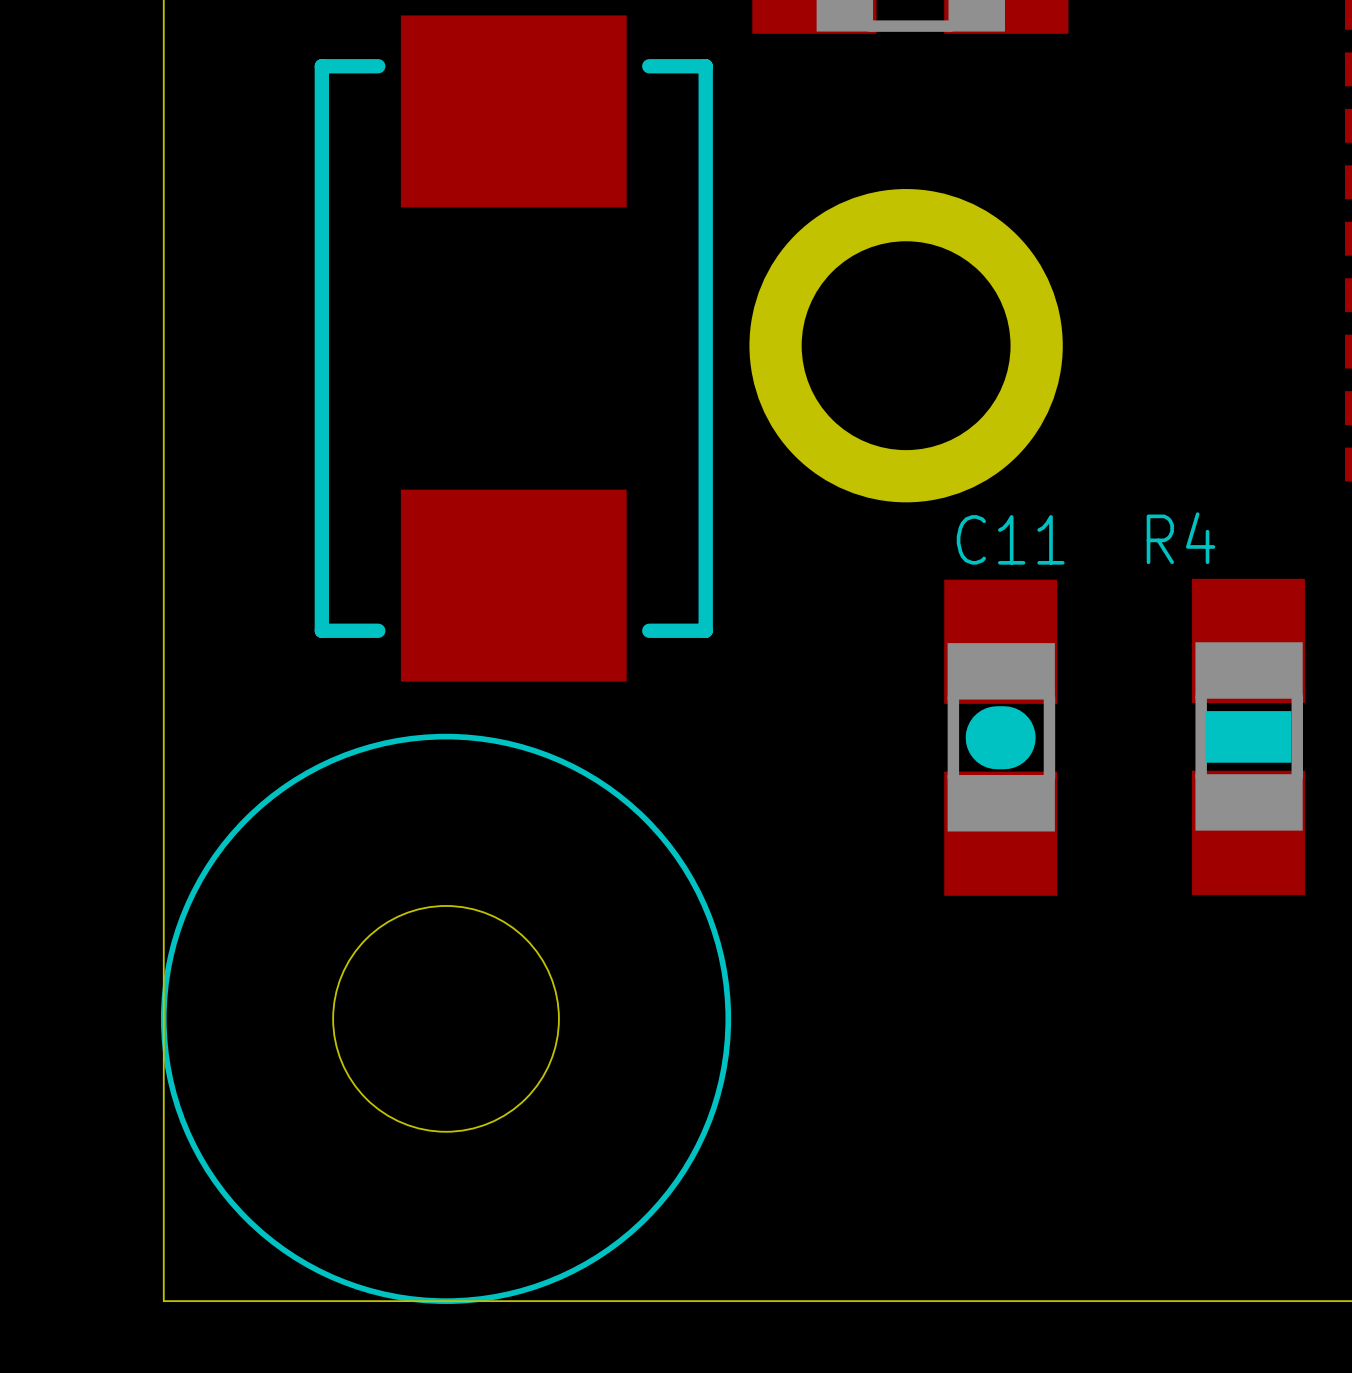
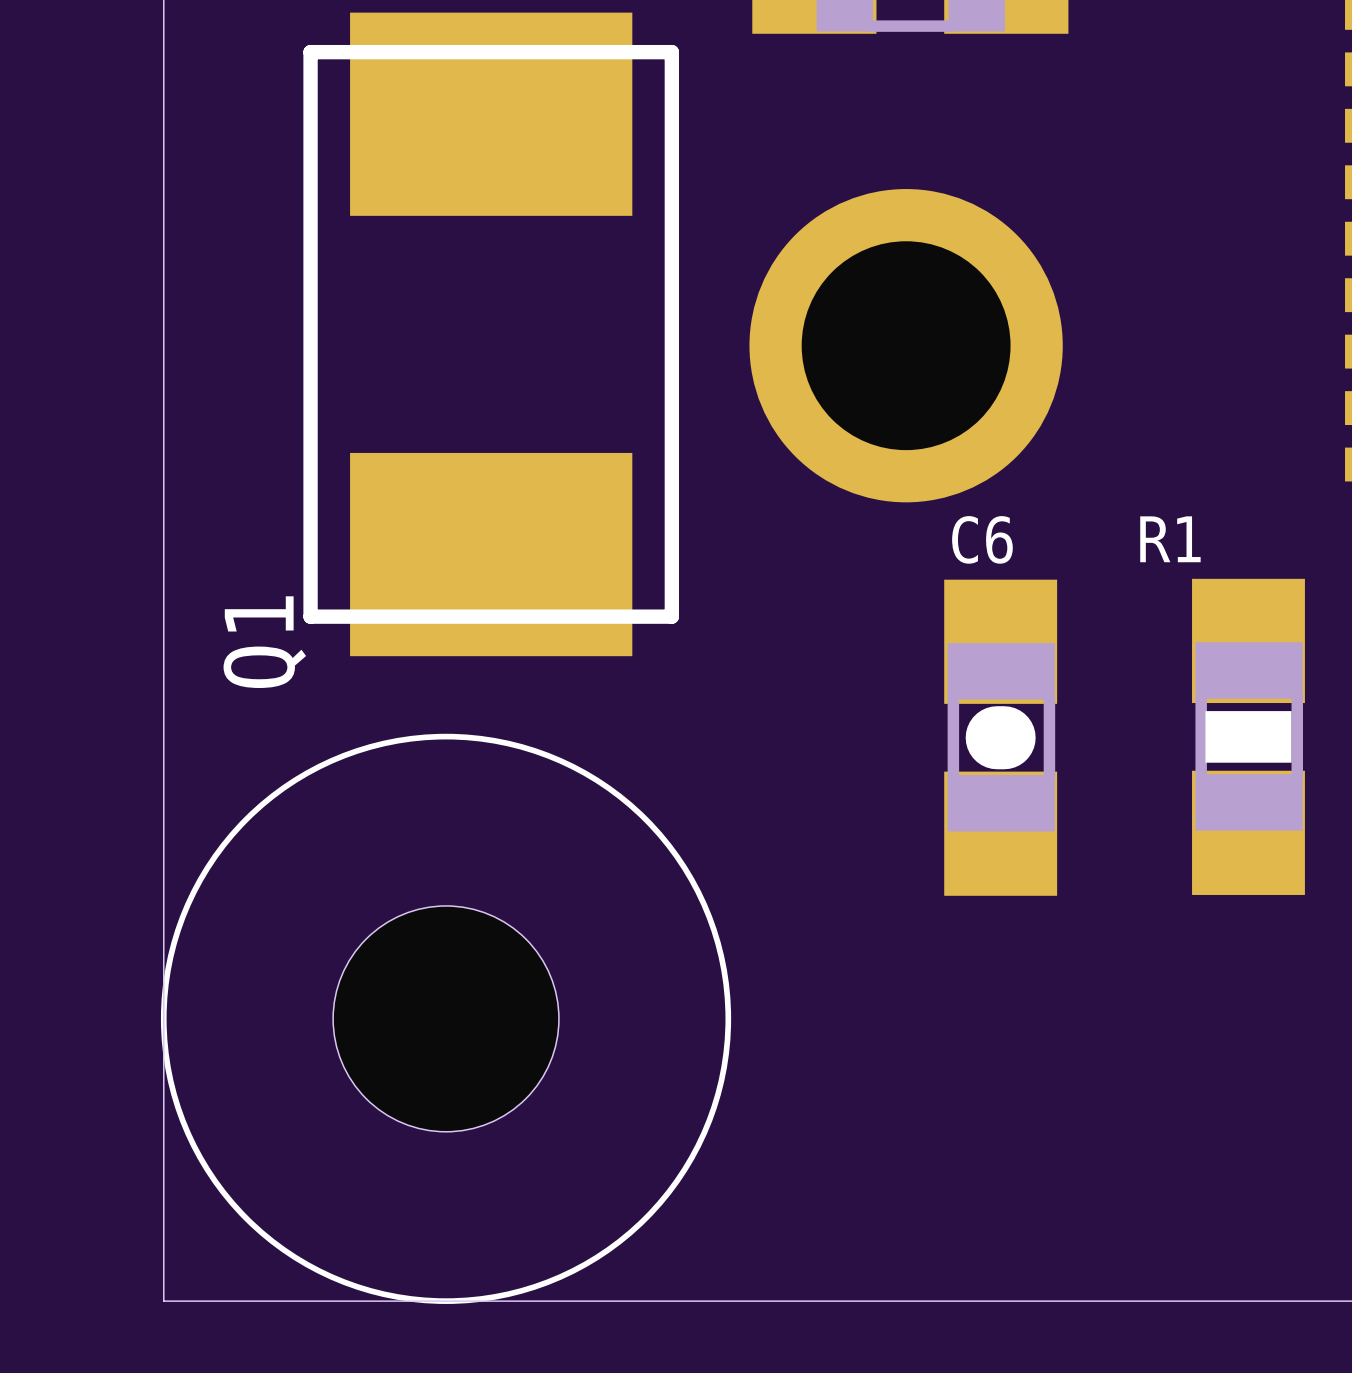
Q1: none -> (491, 334)
part: (513, 348) -> none
R4 name: R4 (1180, 538) -> R1 (1170, 539)
C11 name: C11 (1010, 539) -> C6 (982, 539)

